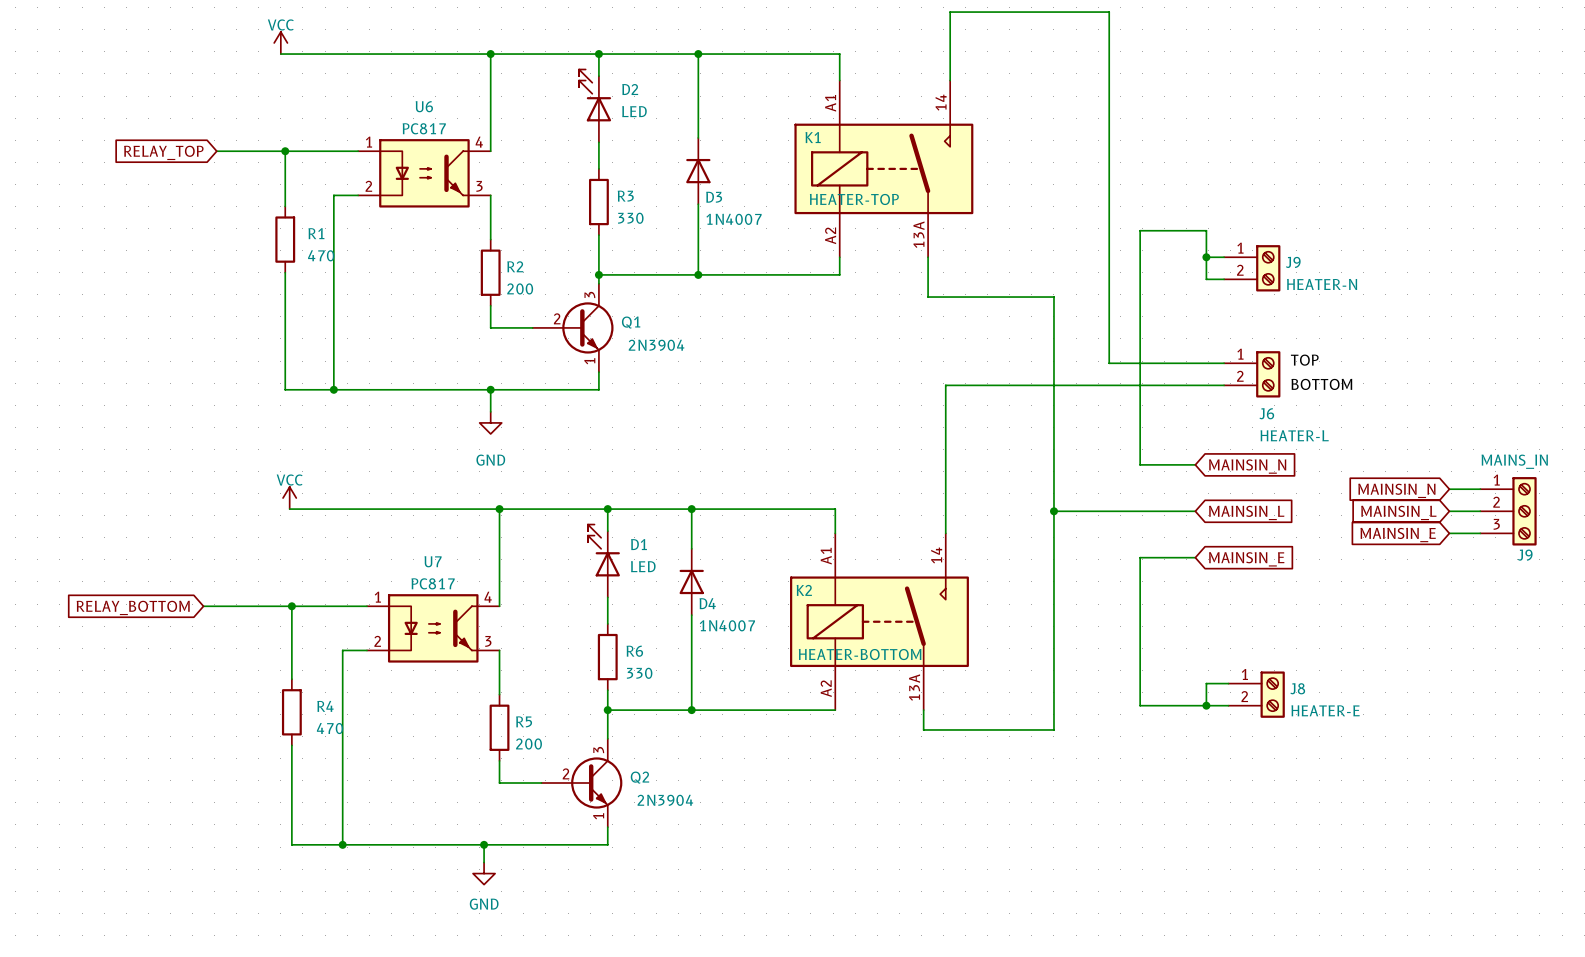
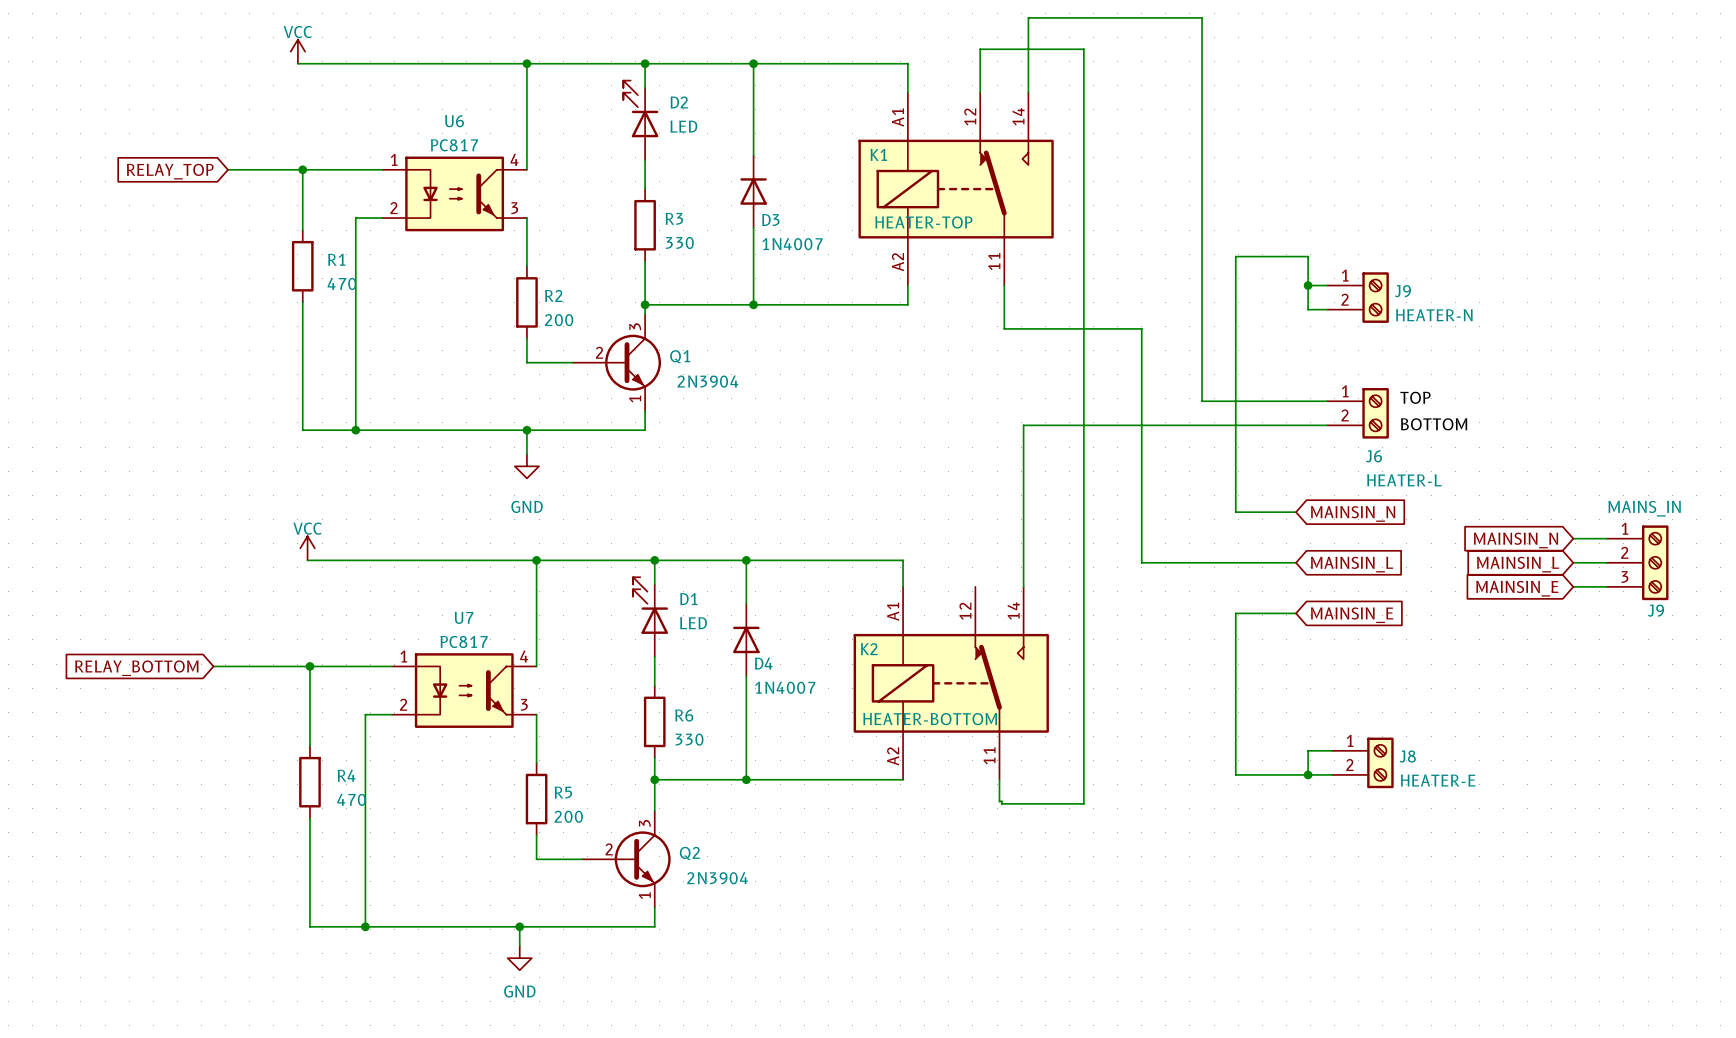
K1 symbol: [794, 80, 974, 258] -> [858, 92, 1054, 286]
wire: (1053, 511) (1053, 729) (925, 729) -> (980, 92) (980, 49) (1083, 49) (1083, 803) (1001, 803) (1001, 801)
junction: (1053, 511) -> none
K2 symbol: [790, 533, 969, 711] -> [853, 586, 1049, 780]

